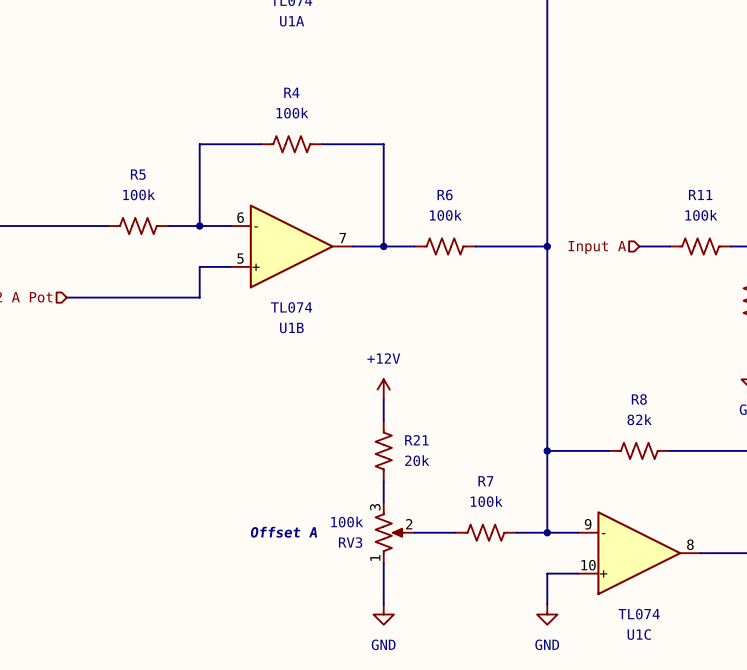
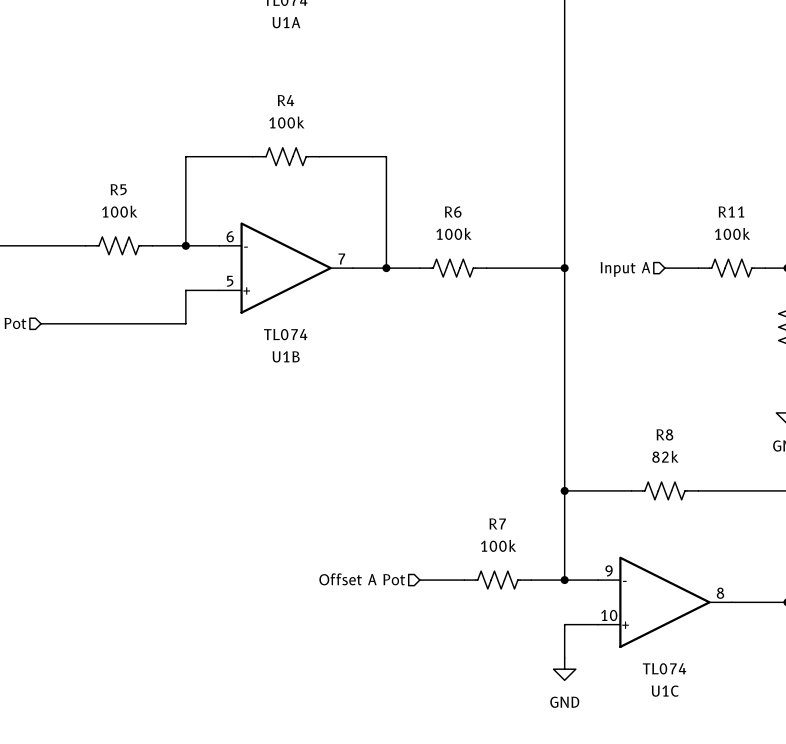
power symbol: +12V (383, 389) -> none
wire: (383, 399) (383, 420) -> none
R21: 20k (383, 450) -> none
wire: (383, 481) (383, 502) -> none
hierarchical label: none -> Offset A Pot (362, 579)
RV3: 100k (394, 532) -> none
wire: (383, 563) (383, 604) -> none
power symbol: GND (383, 614) -> none

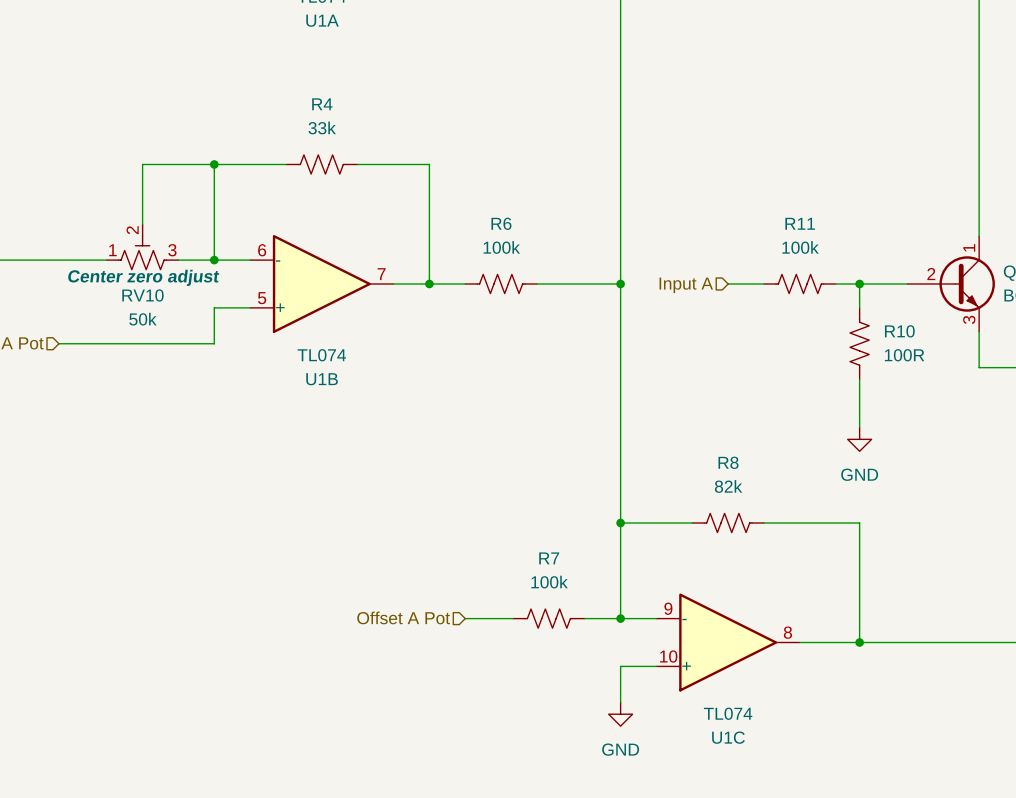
R4 value: 100k (286, 122) -> 33k (322, 127)
wire: none -> (214, 164) (142, 164) (142, 224)
junction: none -> (214, 164)
RV10: none -> 50k (142, 246)
R5: 100k (119, 245) -> none

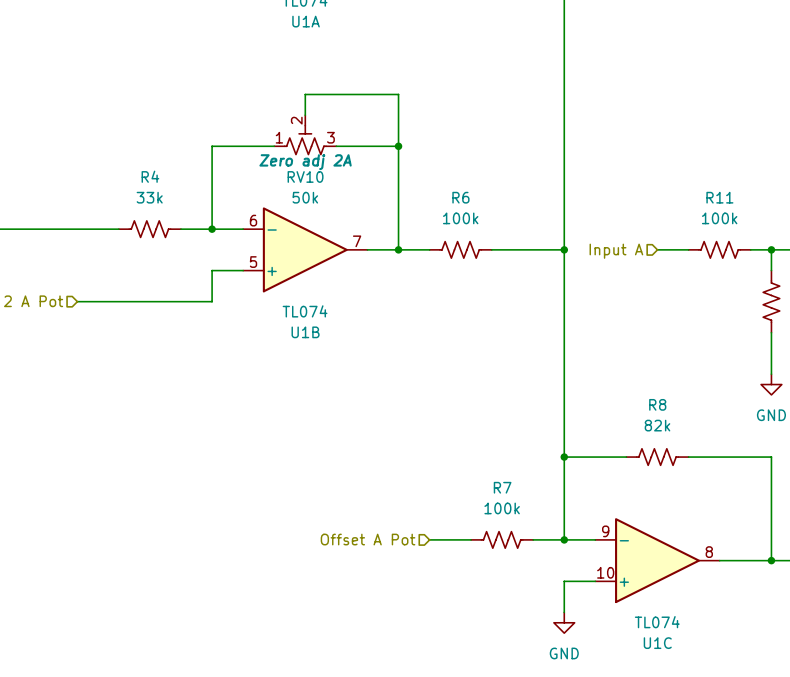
wire: none -> (305, 115) (305, 94) (398, 94) (398, 146)
wire: (214, 164) (142, 164) (142, 224) -> none
junction: (214, 164) -> none
R4 position: (321, 164) -> (149, 229)
junction: none -> (398, 146)
RV10 position: (142, 246) -> (305, 134)
RV10 text: Center zero adjust (143, 277) -> Zero adj 2A (305, 162)

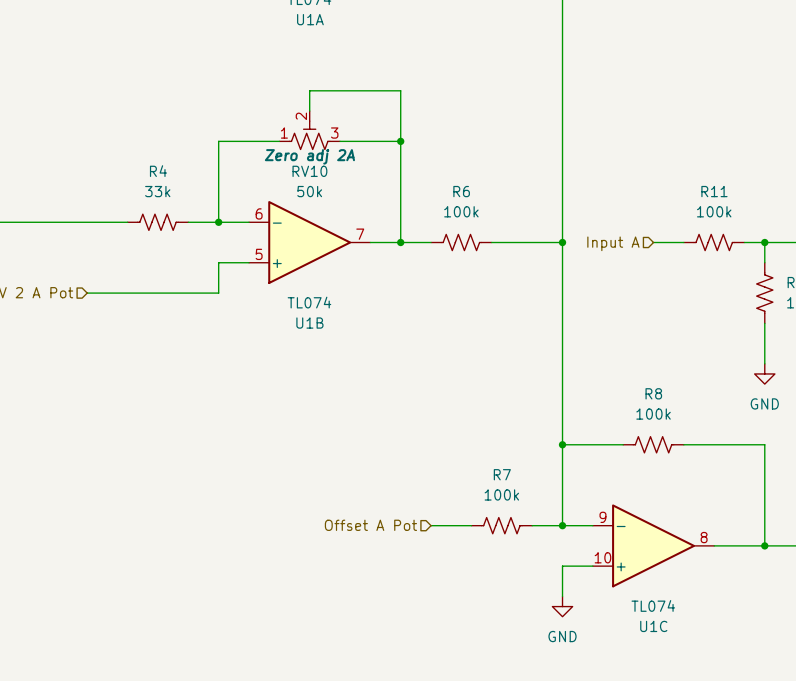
R8 value: 82k (657, 425) -> 100k (653, 414)

